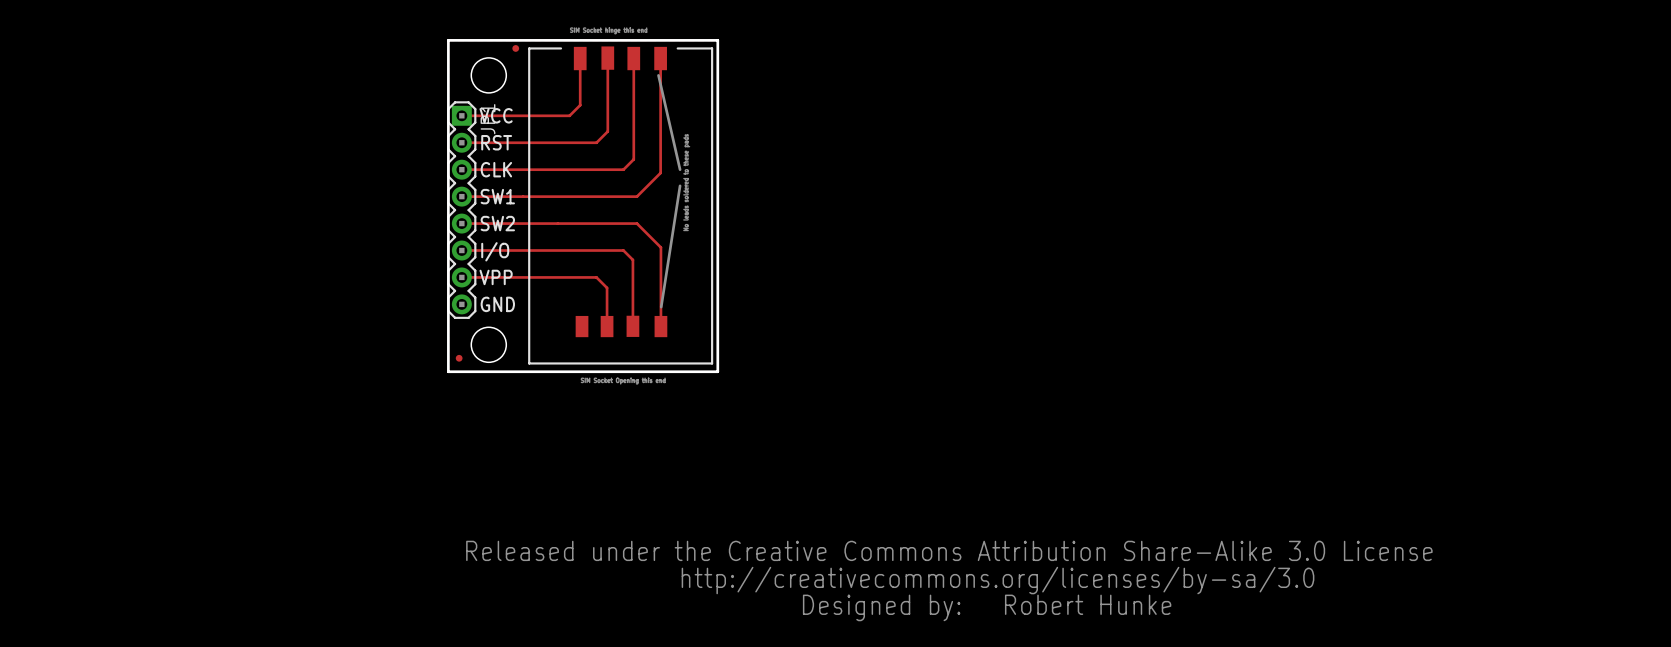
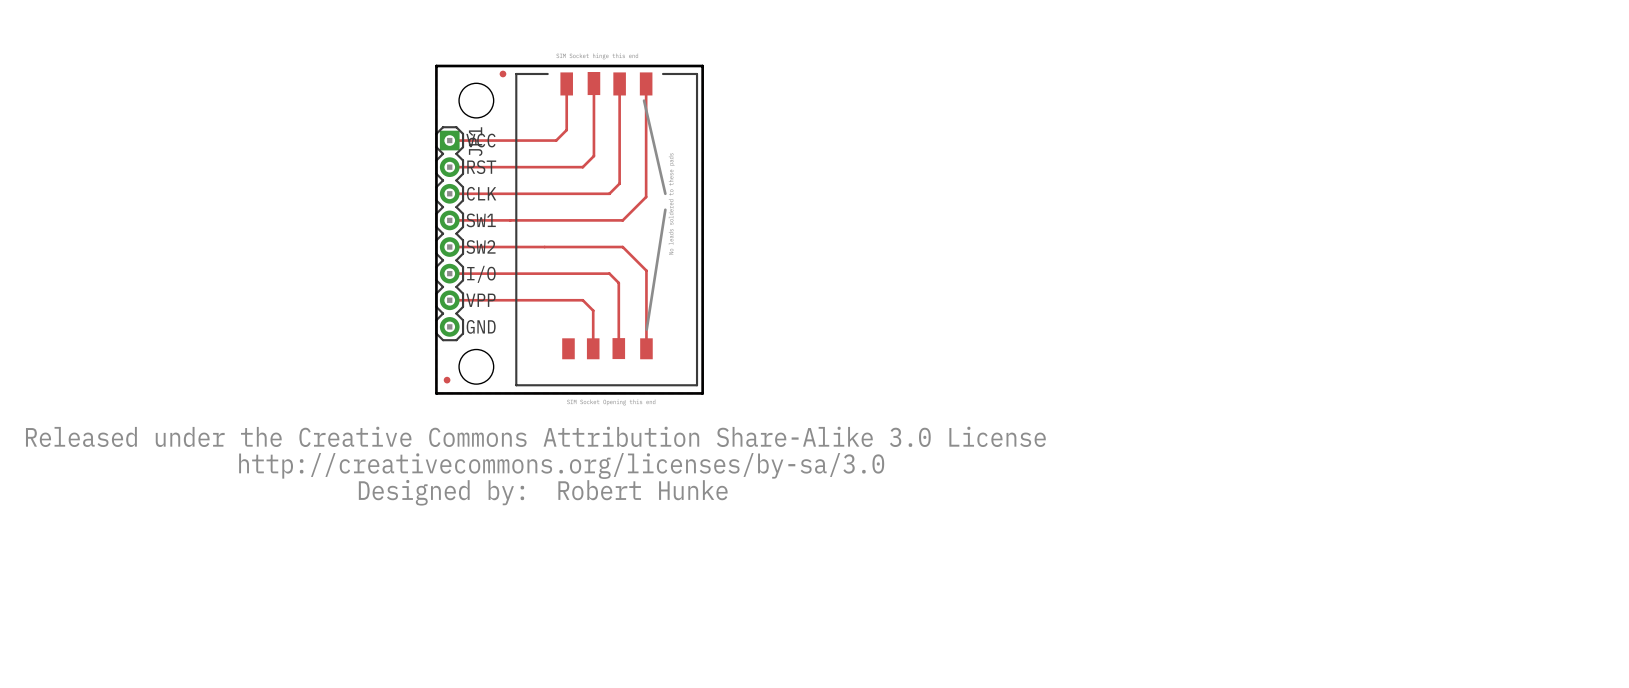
drawing: none -> [25, 426, 1046, 506]
text: none -> Robert Hunke (642, 490)
drawing: [466, 540, 1433, 622] -> none
text: Robert Hunke (1088, 604) -> none

